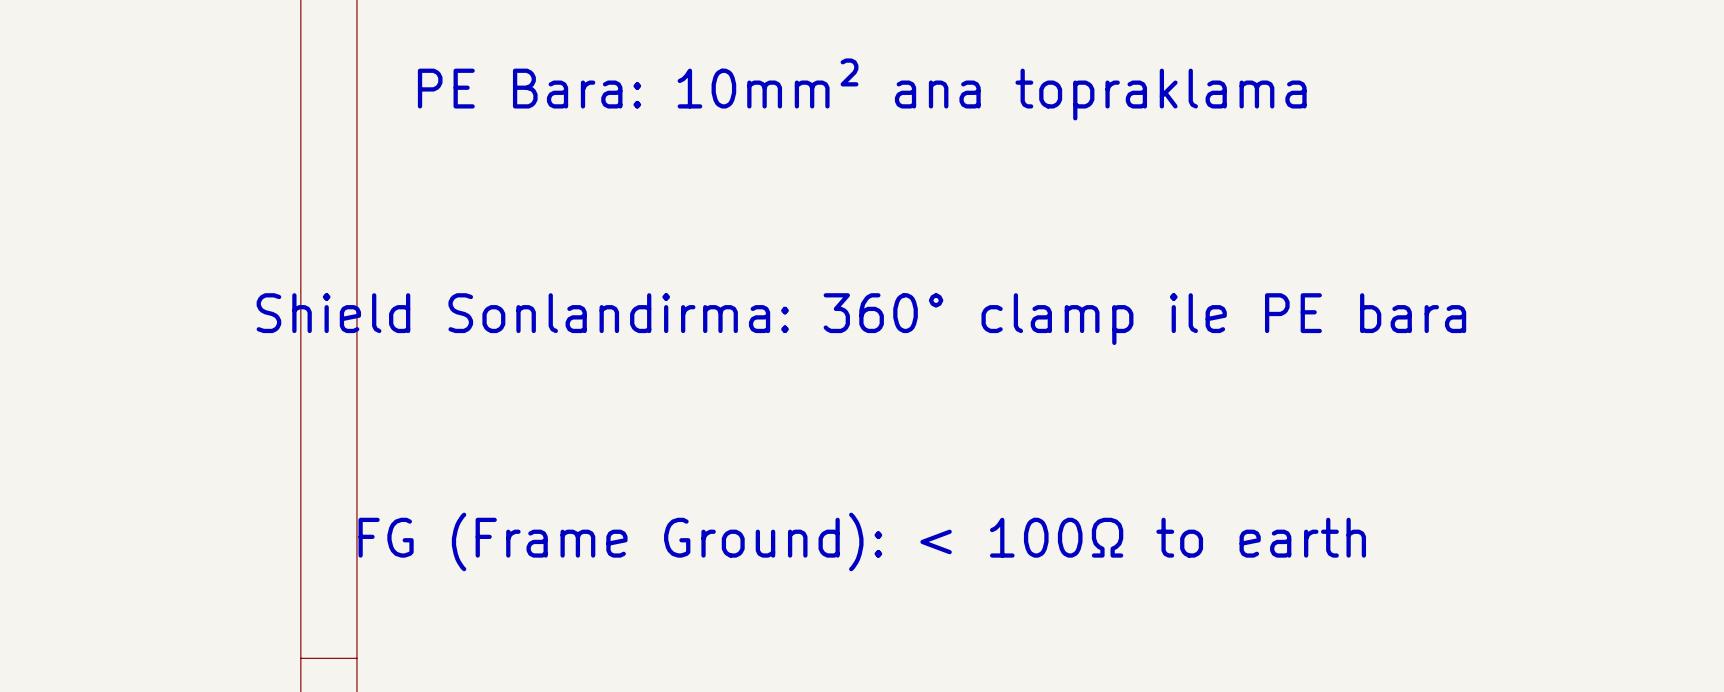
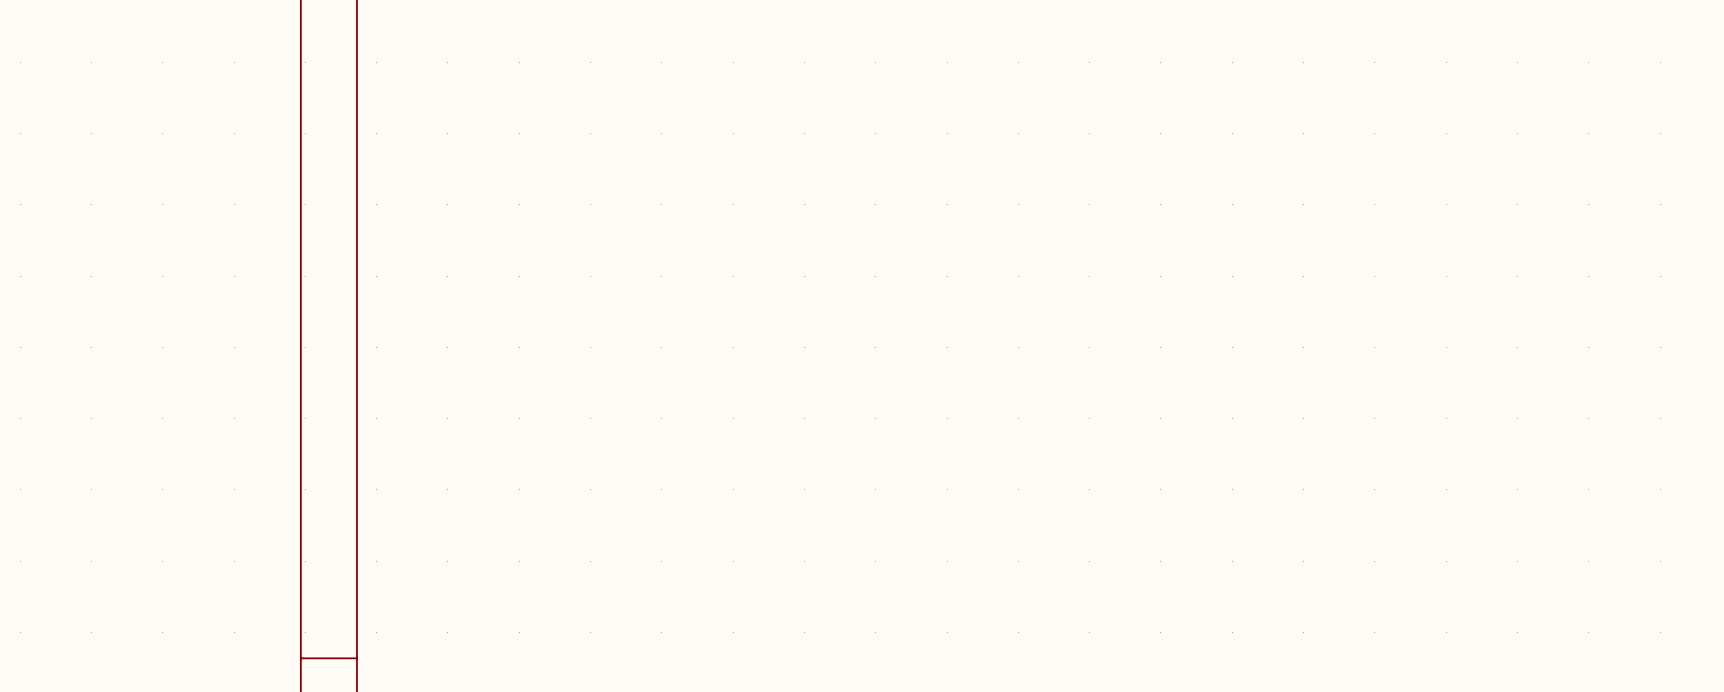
text: PE Bara: 10mm² ana topraklama (862, 89) -> none
text: Shield Sonlandirma: 360° clamp ile PE bara (861, 319) -> none
text: FG (Frame Ground): < 100Ω to earth (862, 541) -> none

